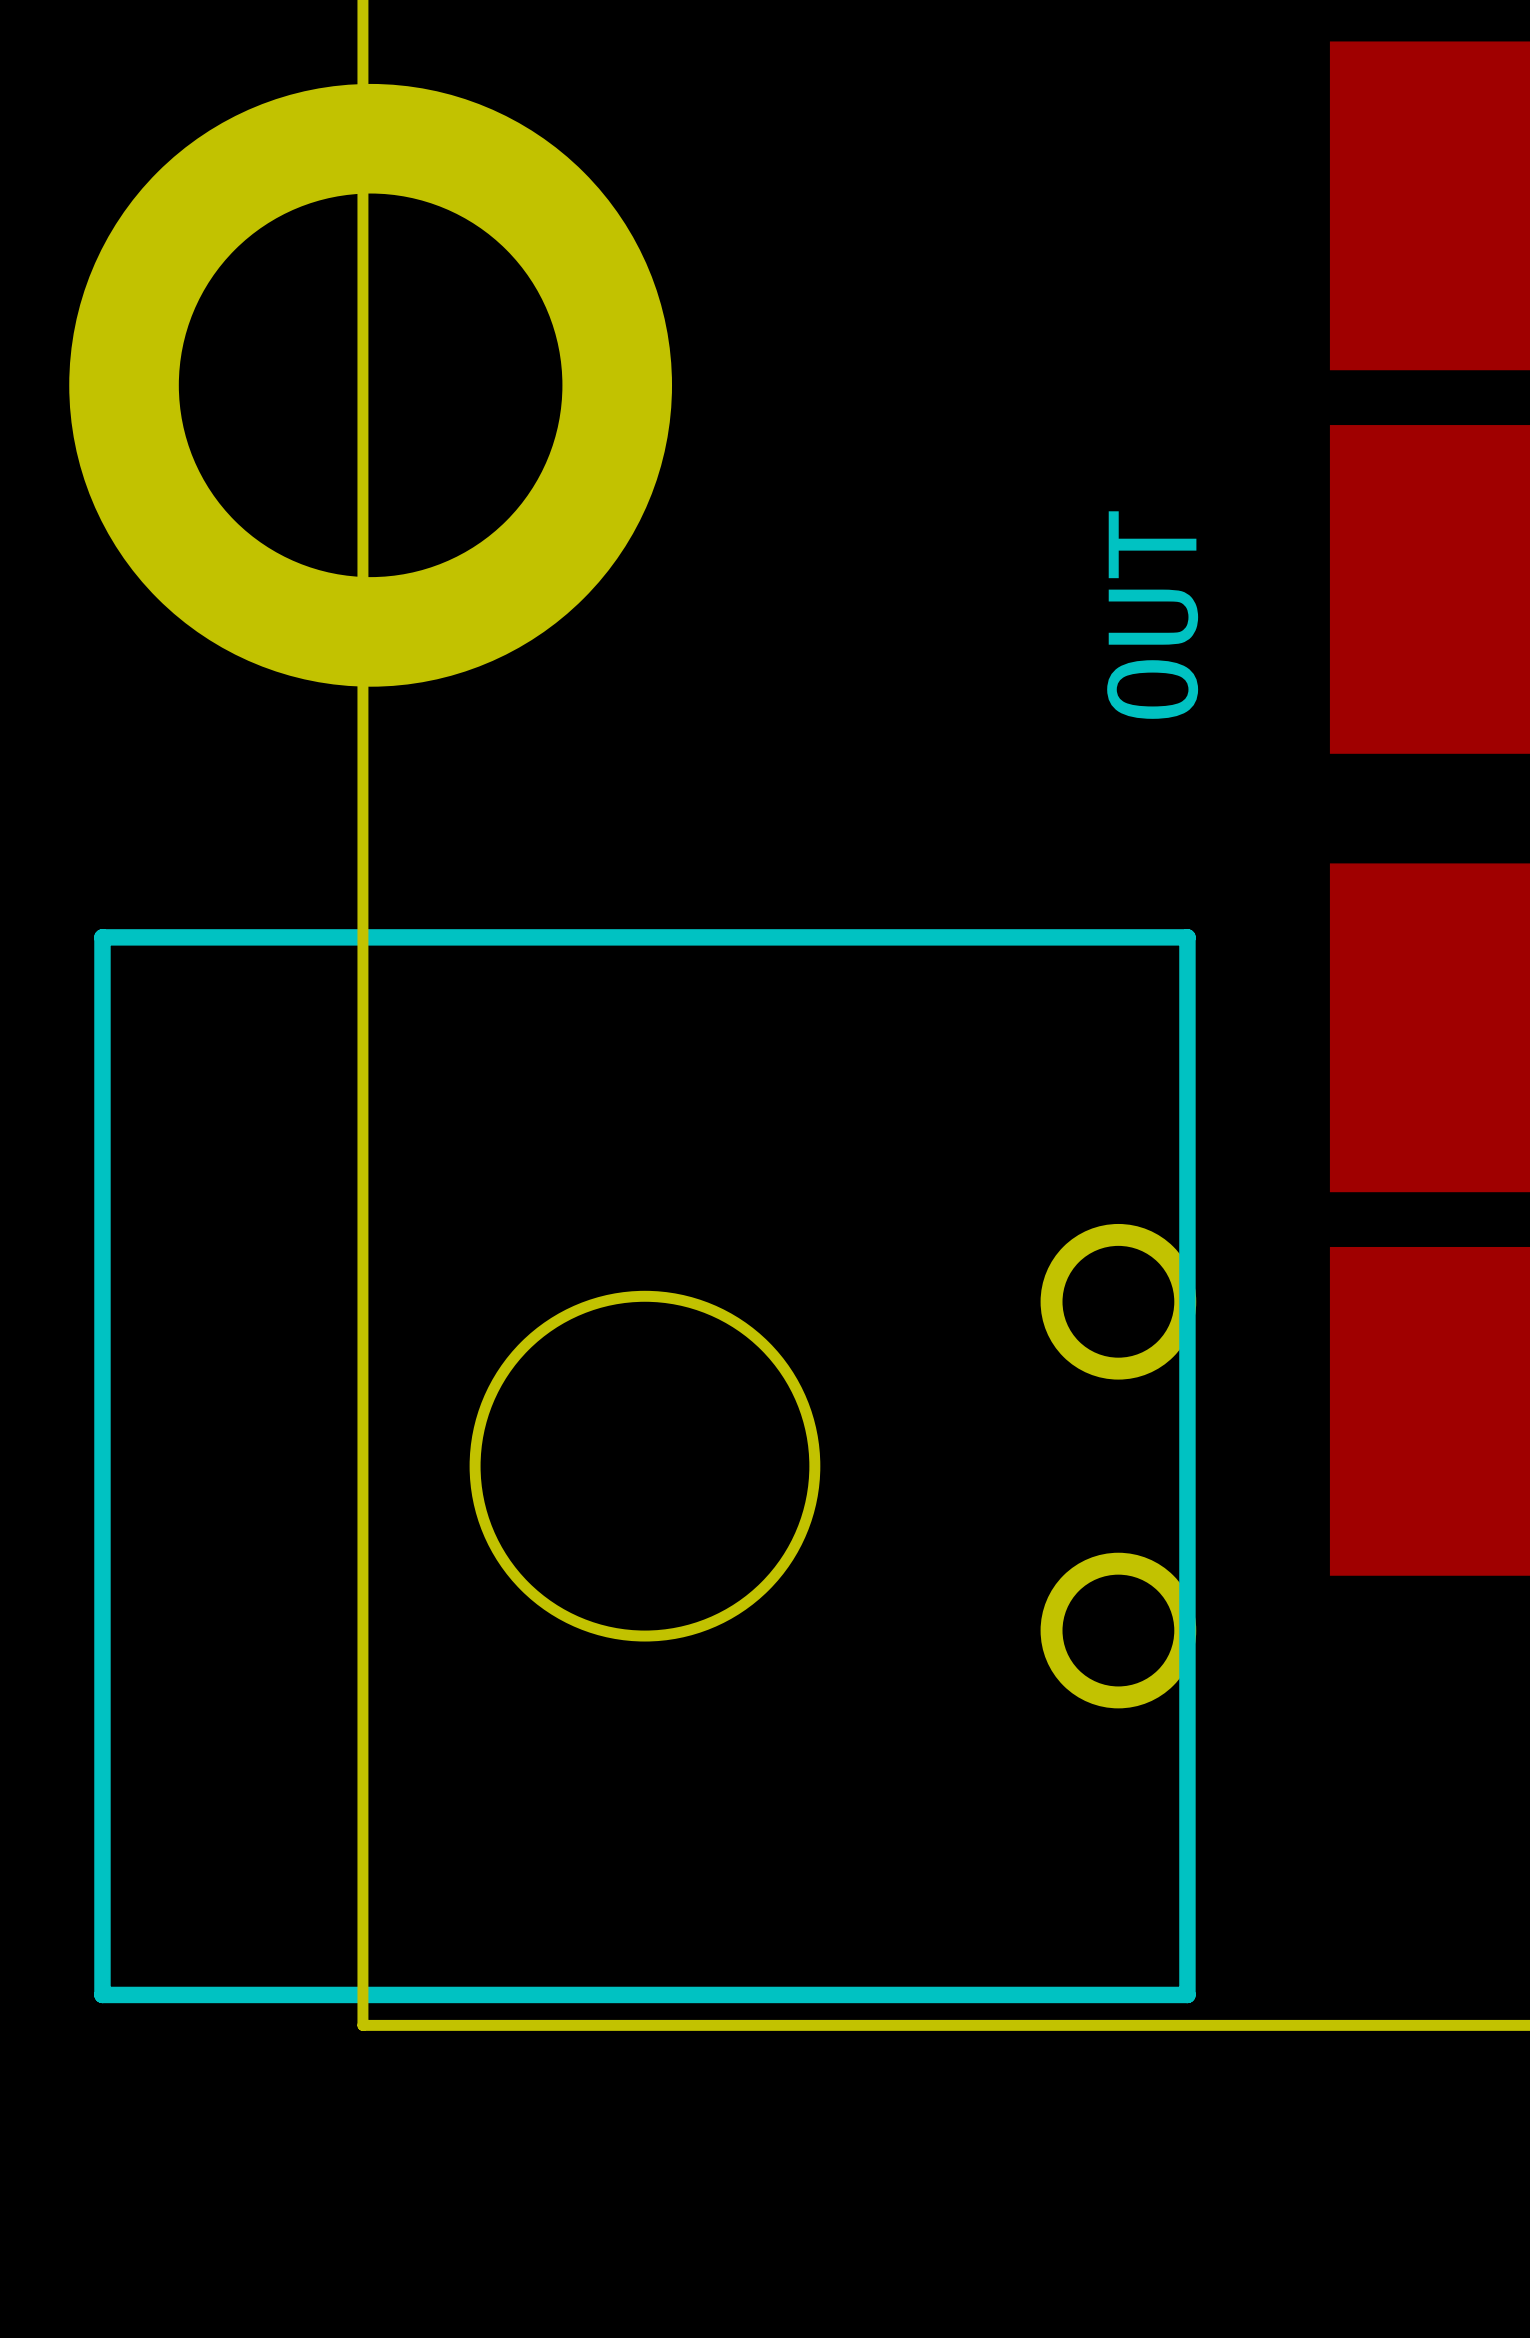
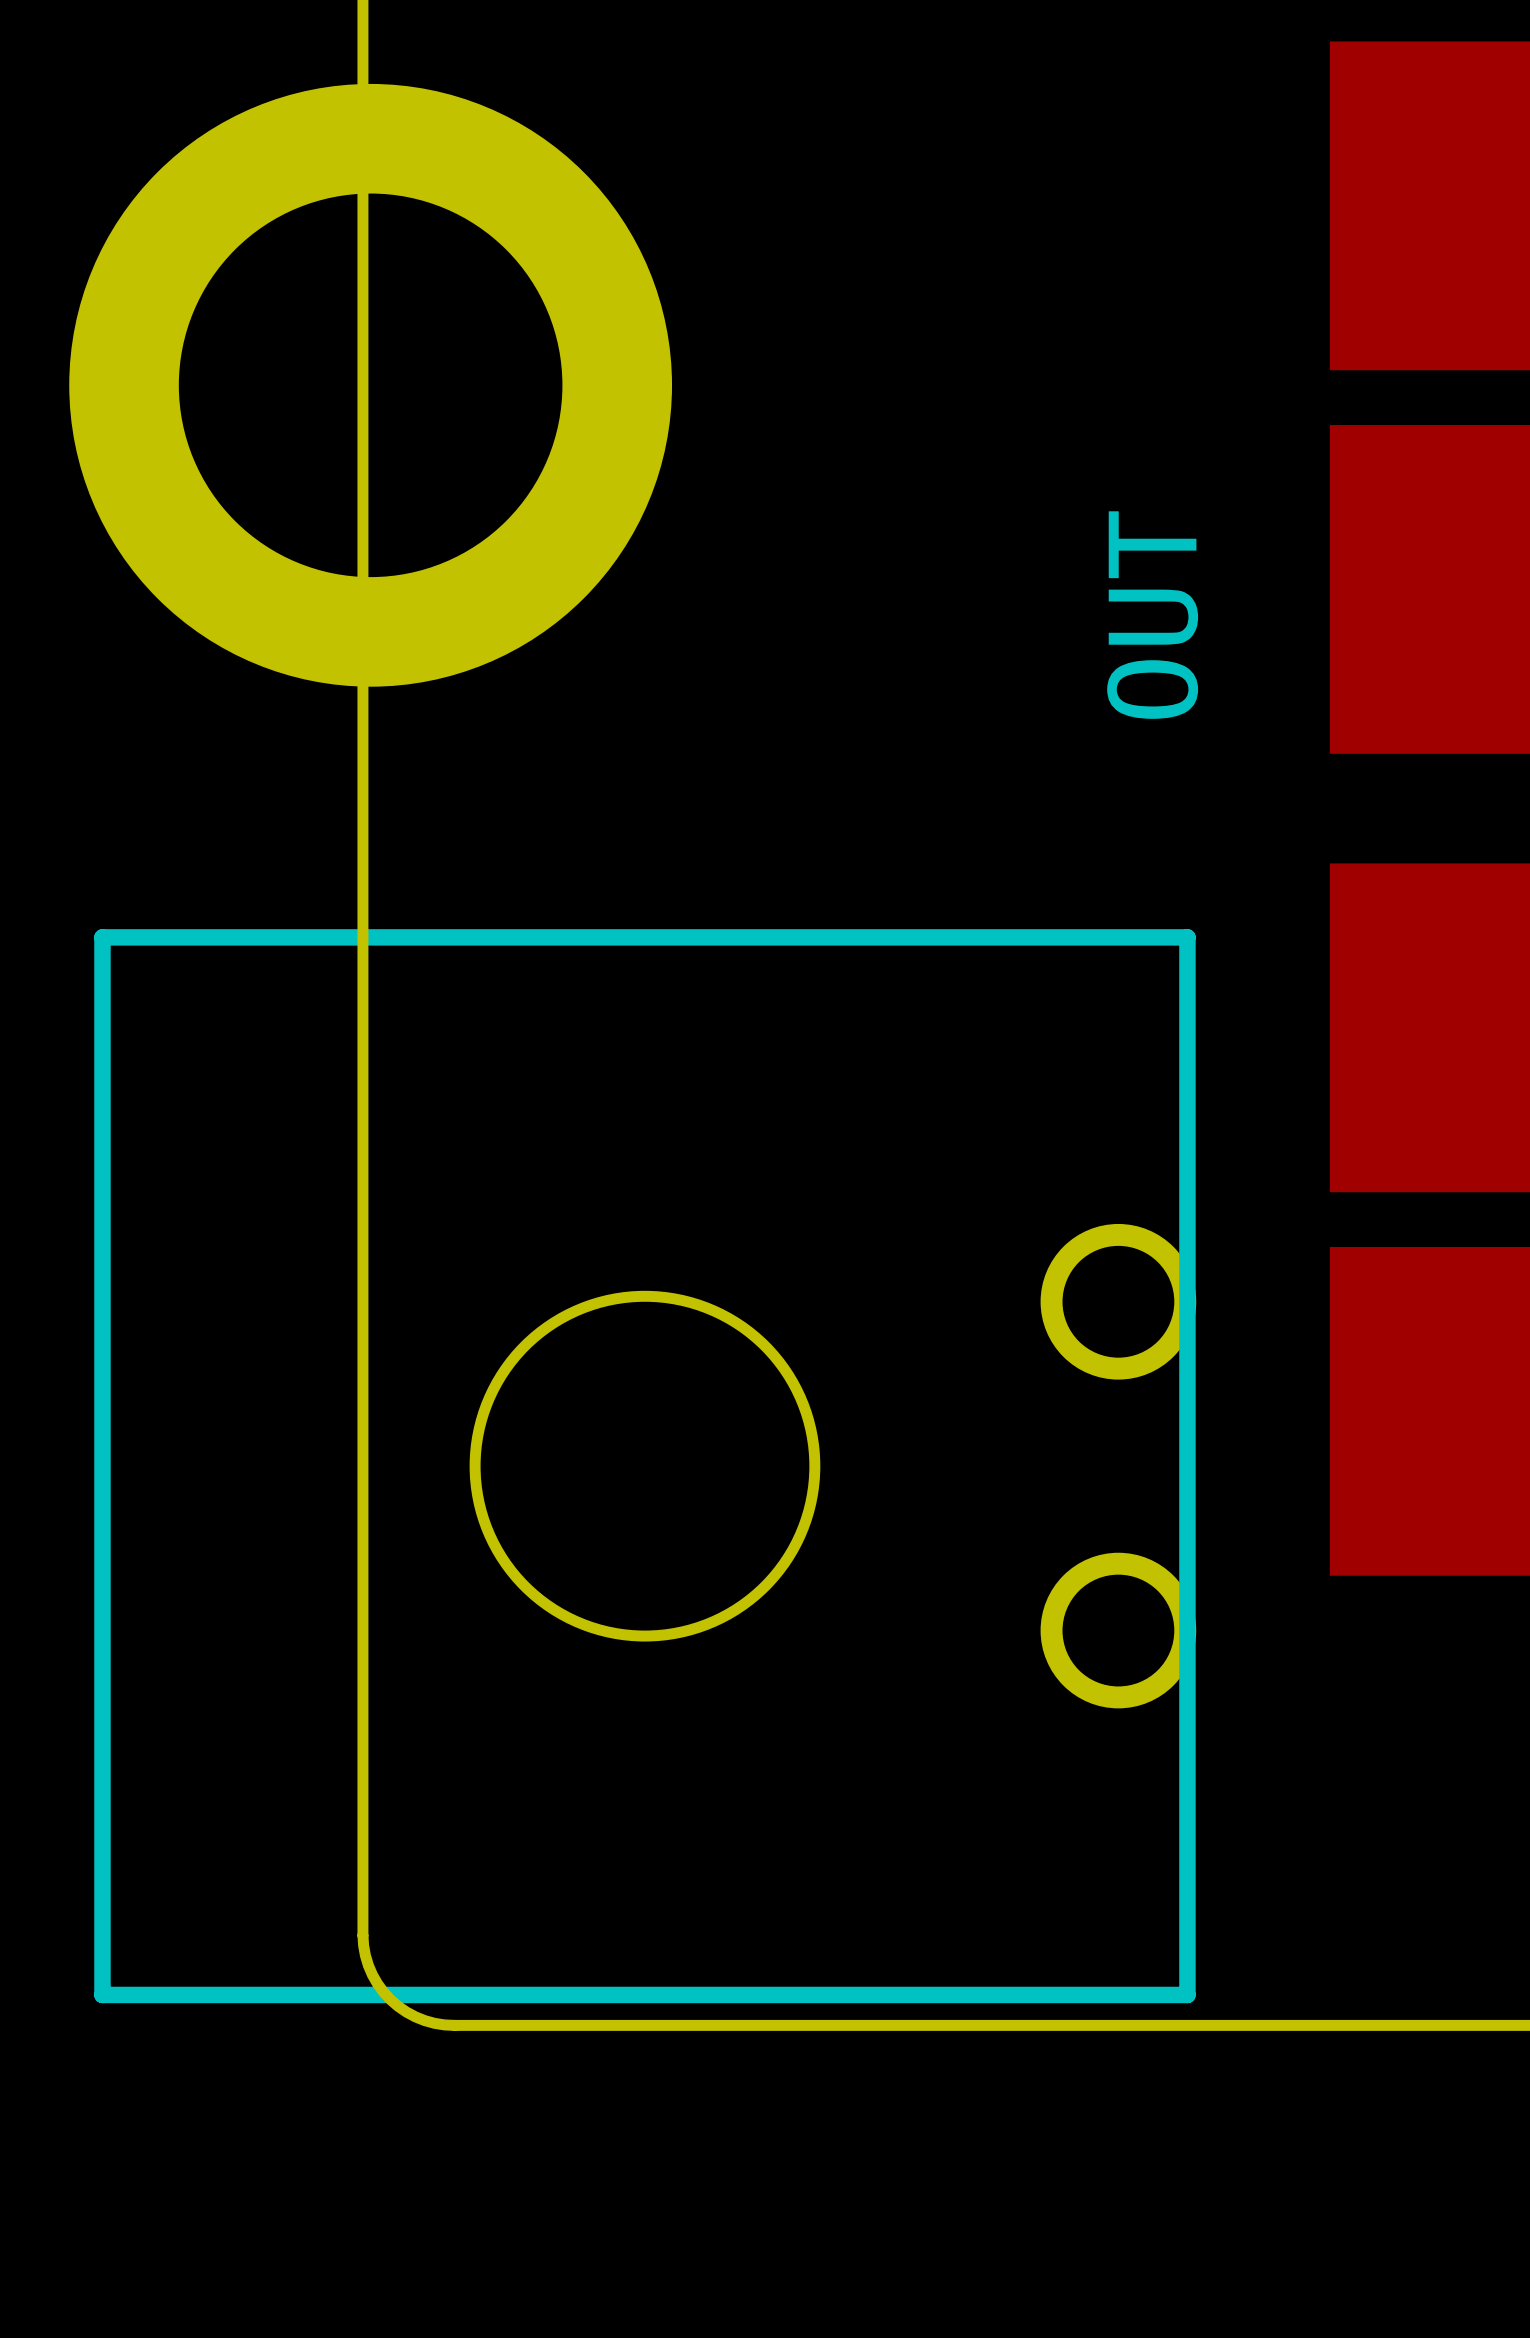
board edge: (362, 1935) (362, 2025) (454, 2025) -> (362, 1935) (365, 1955) (372, 1974) (390, 1999) (415, 2016) (434, 2023) (454, 2025)

